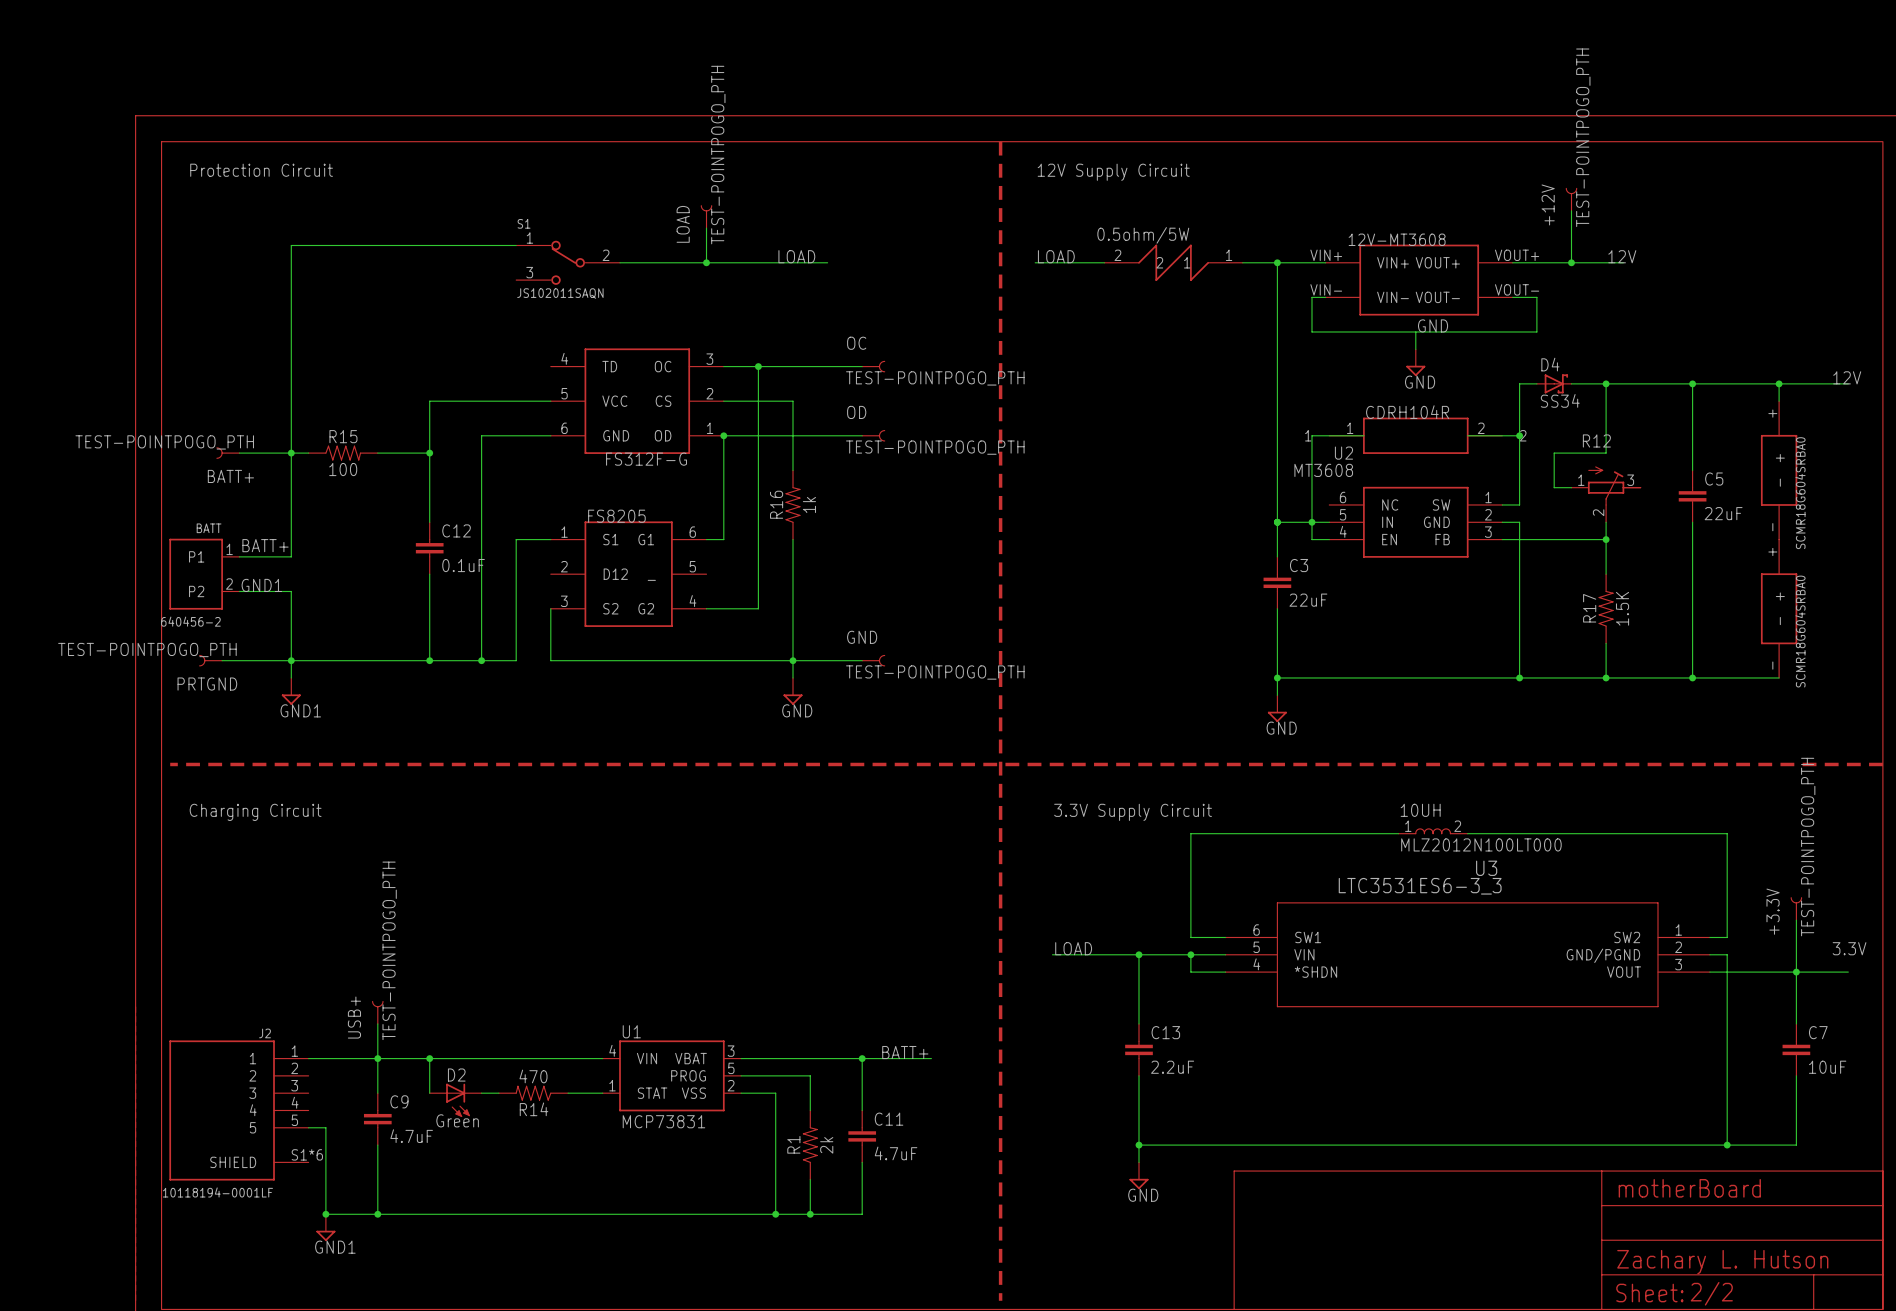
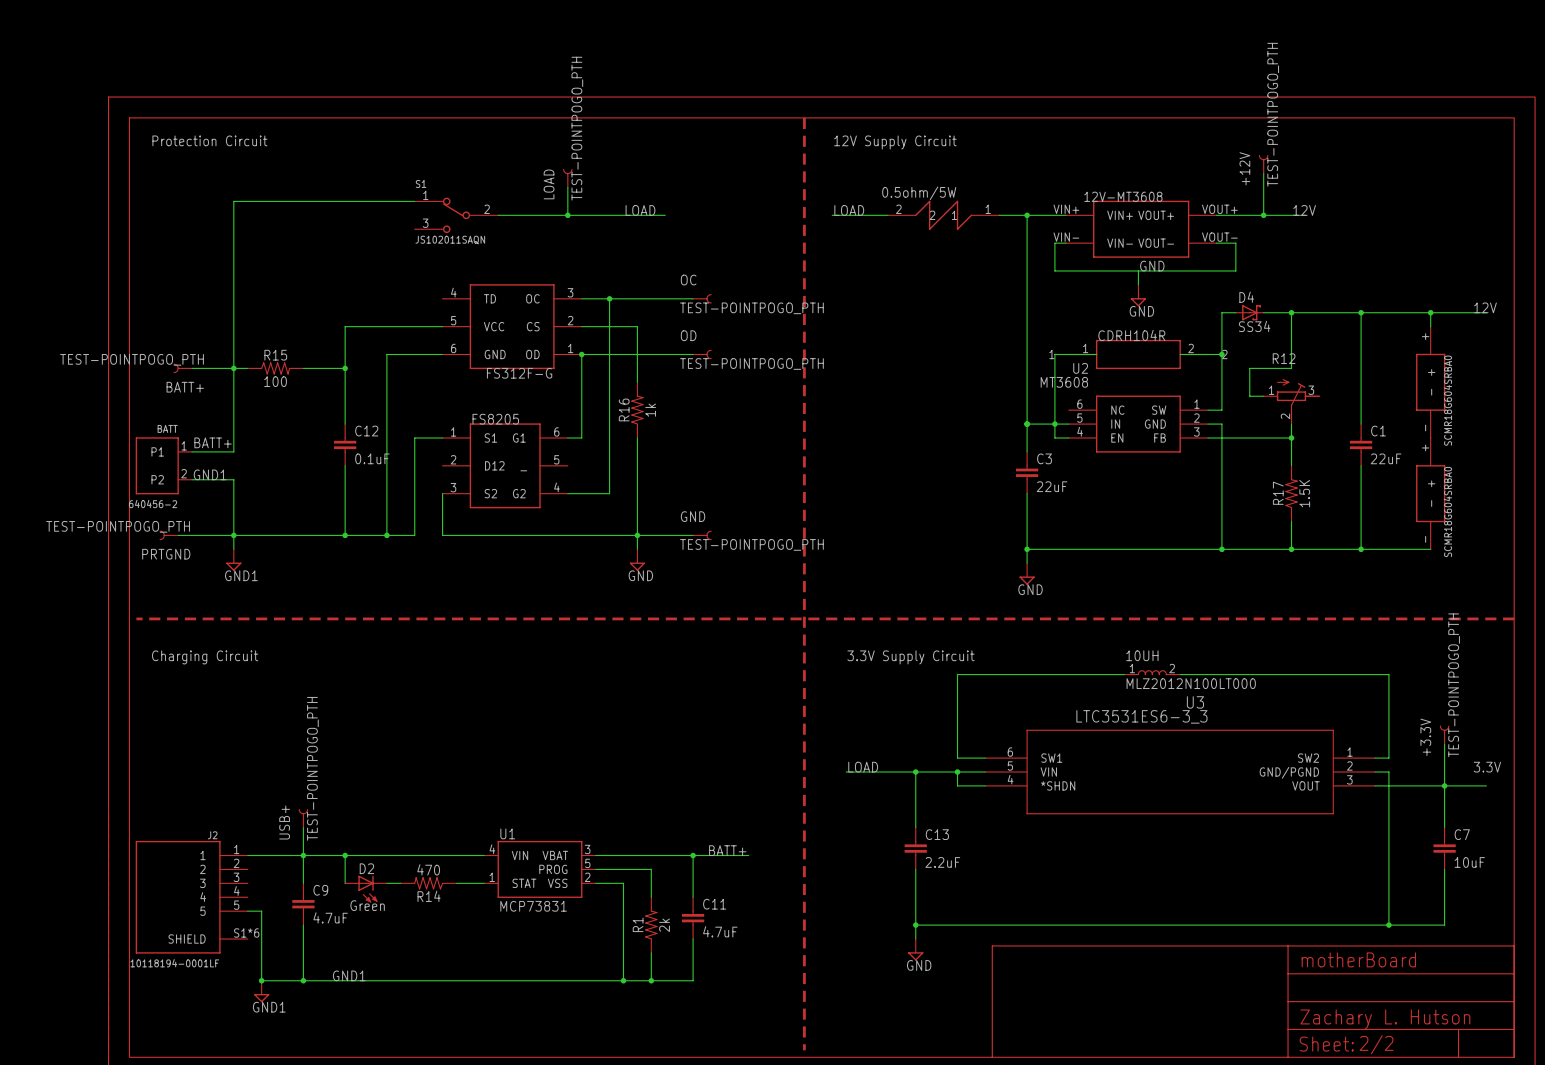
C5: 22uF (1692, 496) -> none
C1: none -> 22uF (1361, 444)
label: none -> GND1 (349, 975)

